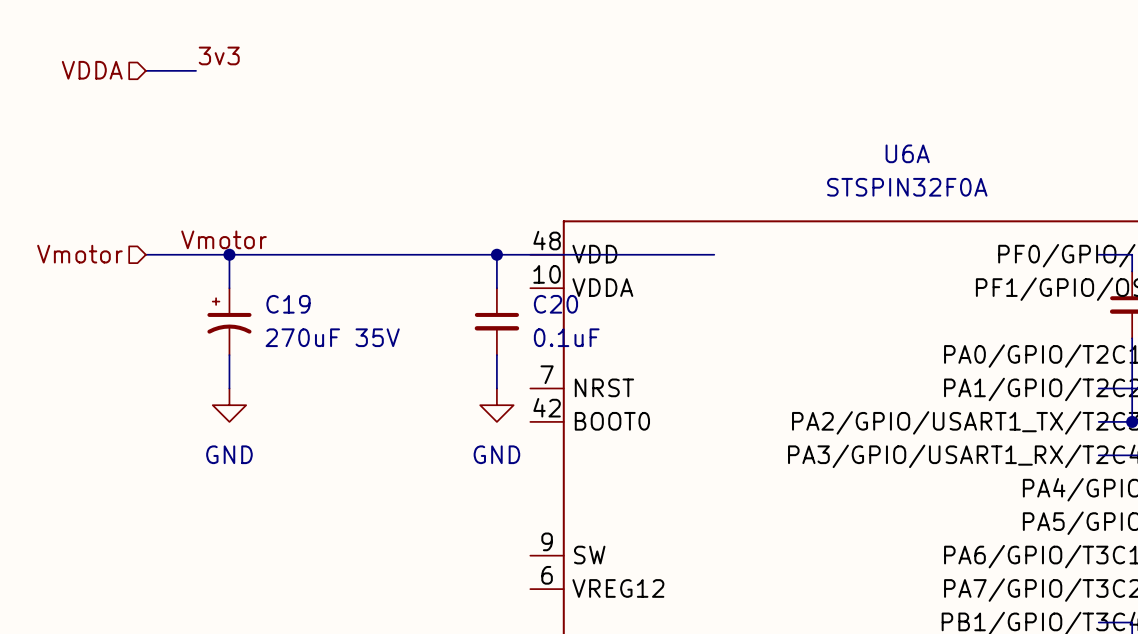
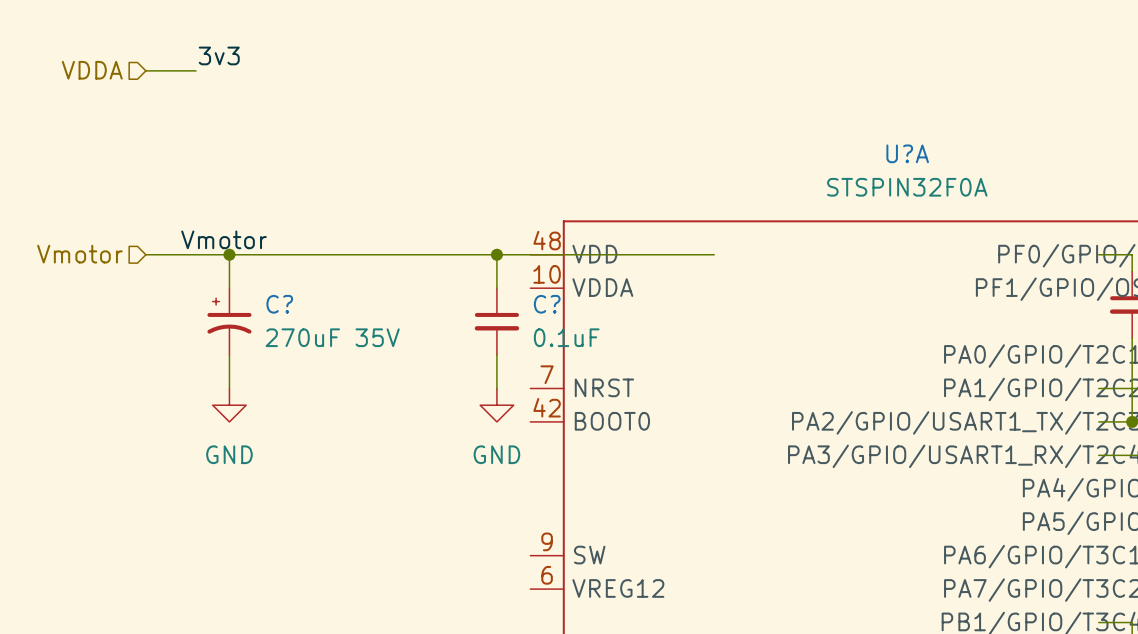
U6A name: U6A (907, 153) -> U?A (907, 153)
C19 name: C19 (288, 304) -> C? (279, 304)
C20 name: C20 (555, 304) -> C? (547, 304)

